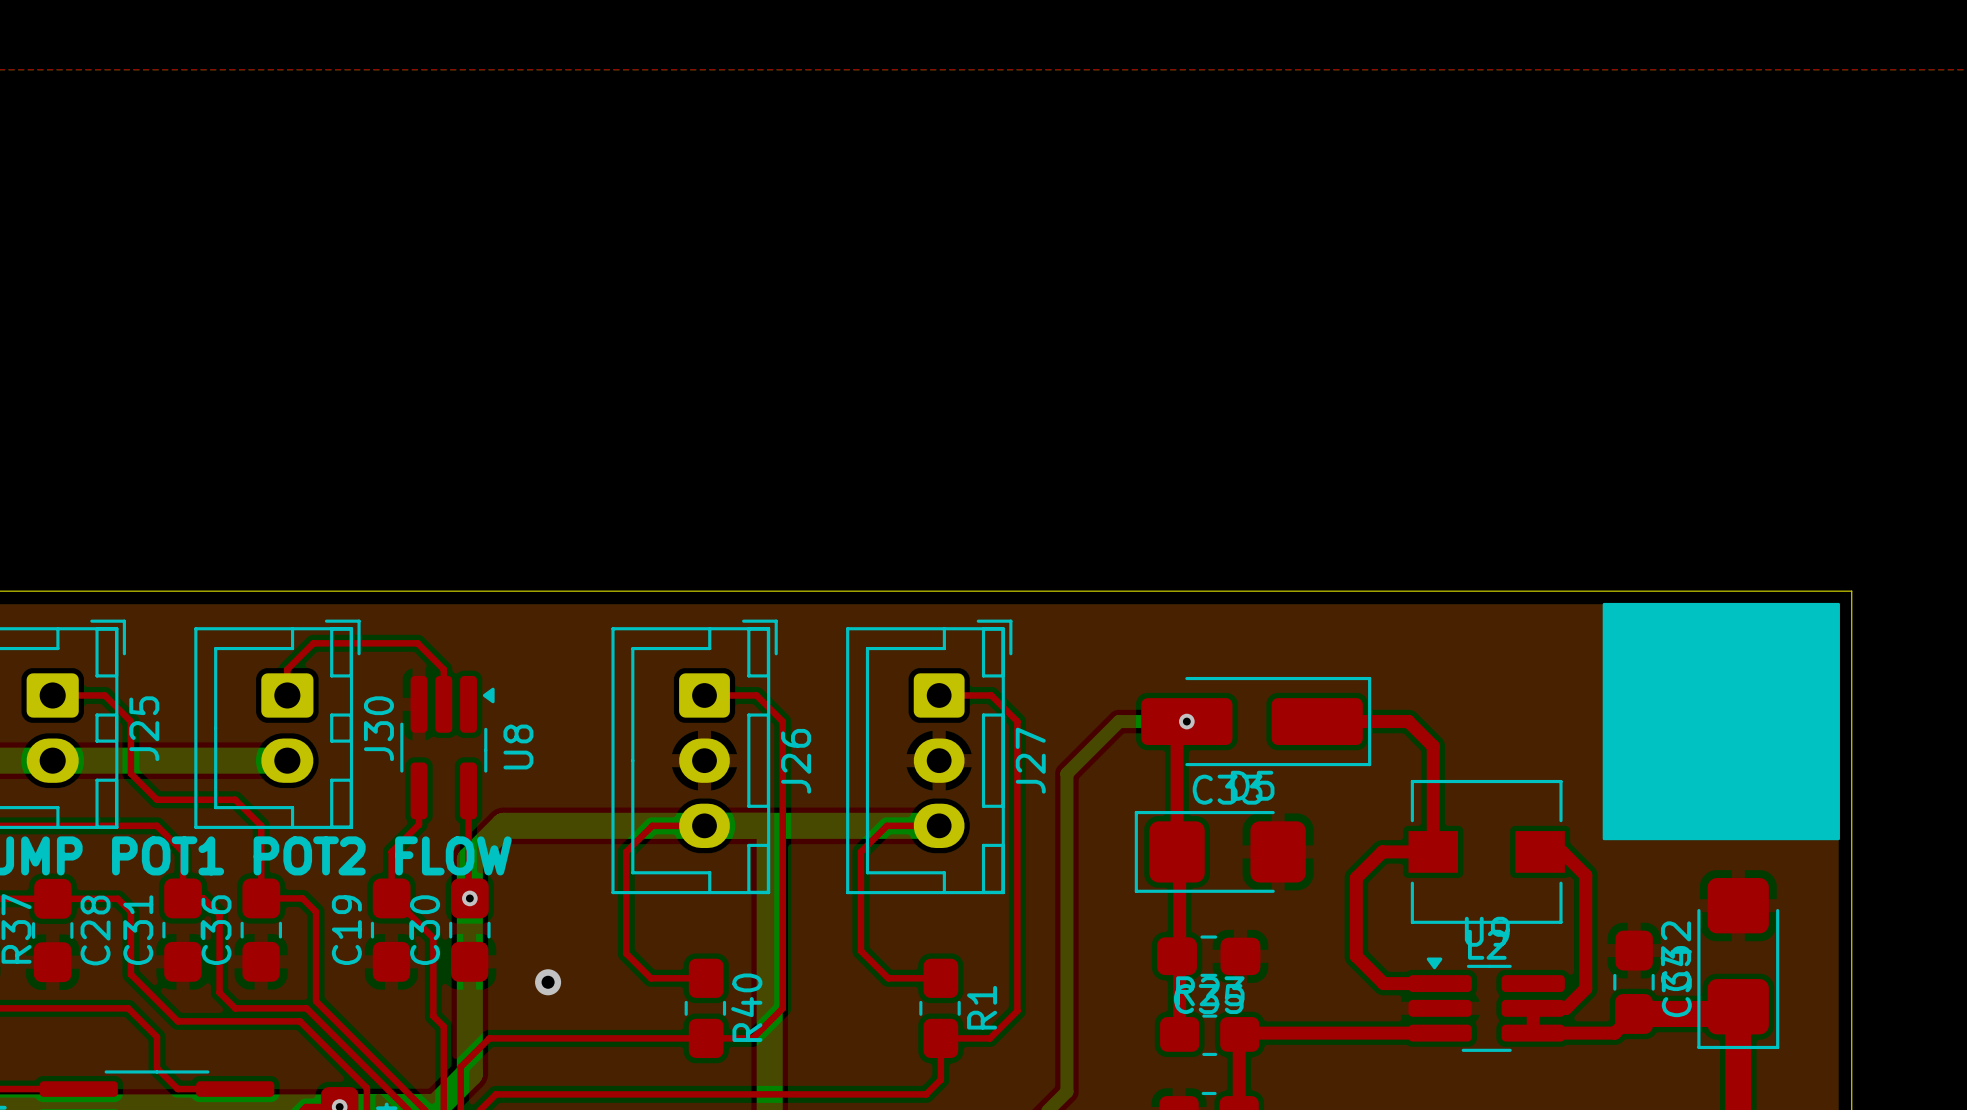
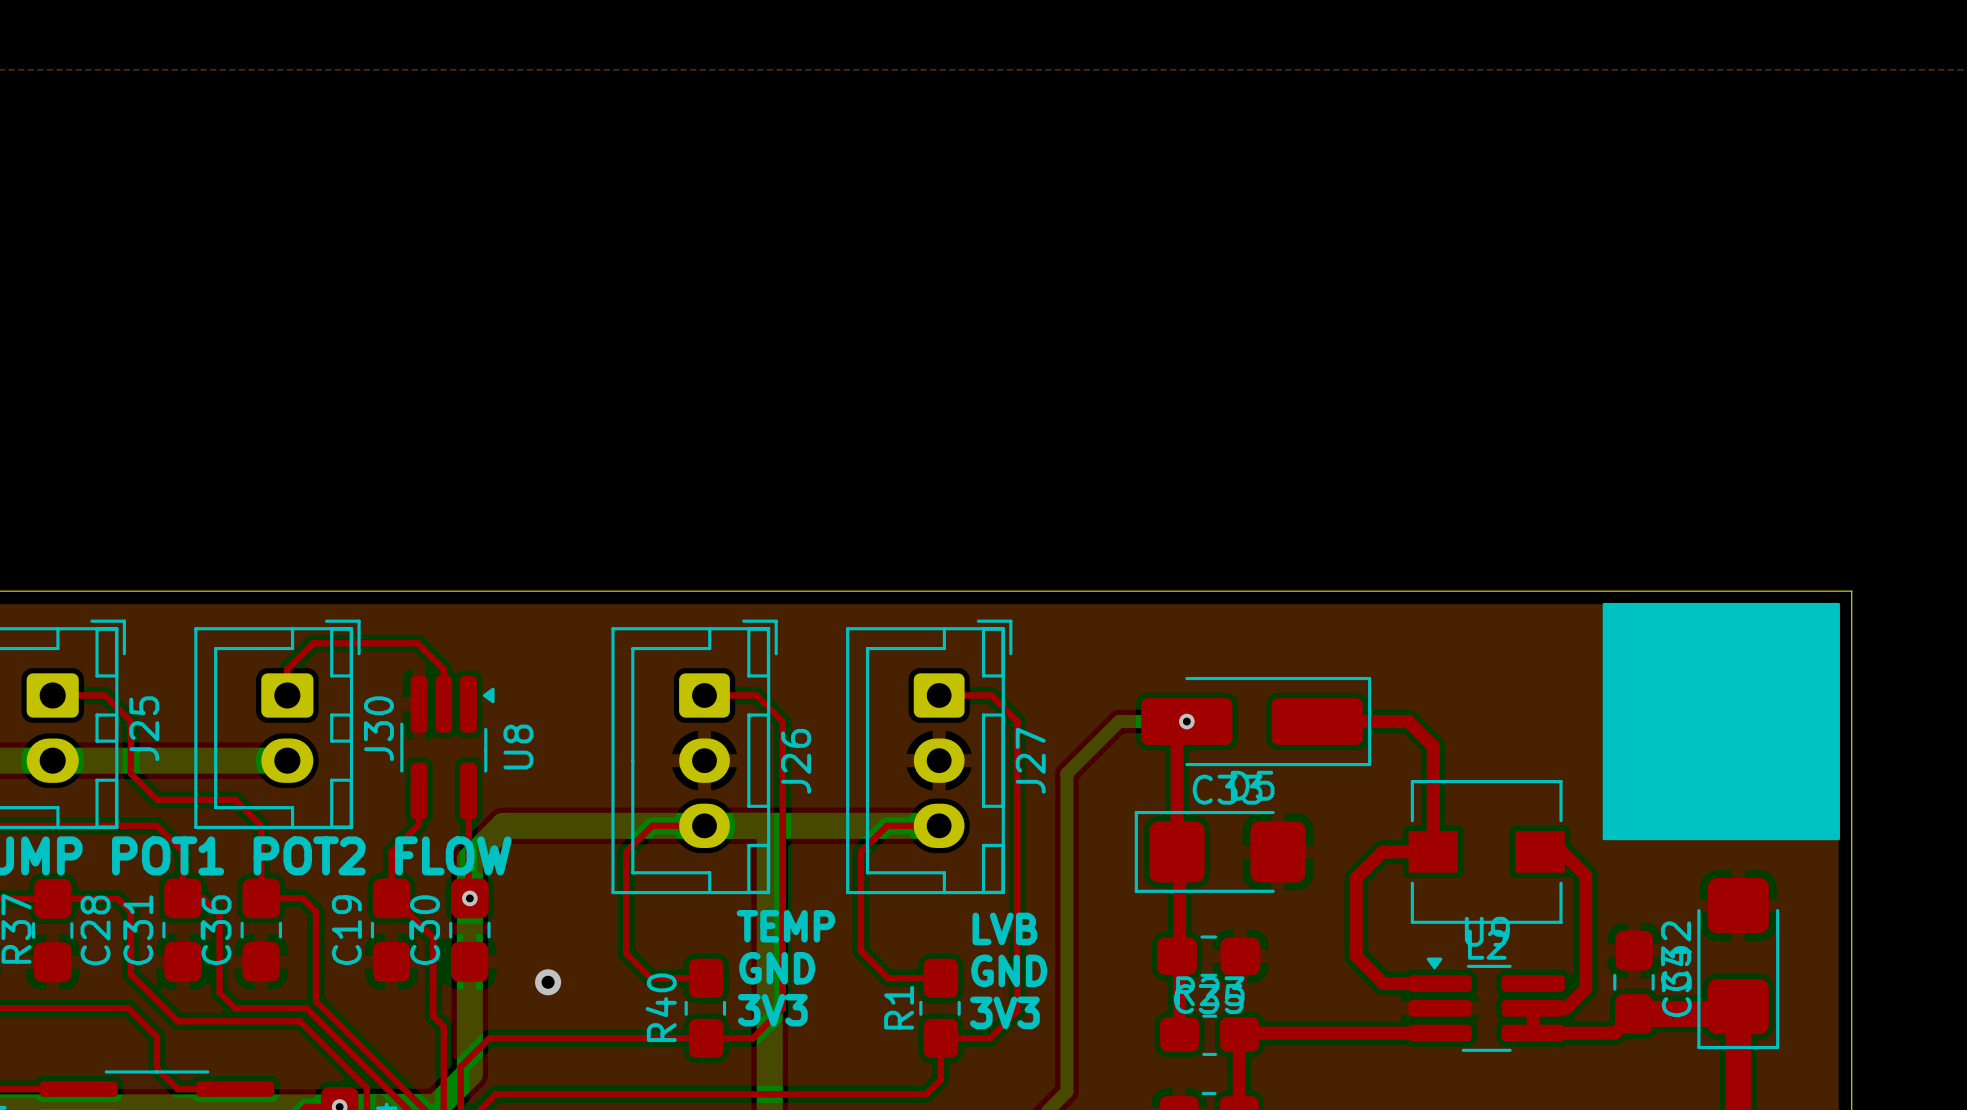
text: none -> TEMP (785, 926)
text: none -> LVB (1004, 928)
text: none -> GND (777, 968)
text: none -> GND (1009, 970)
R40 name position: R40 (746, 1007) -> R40 (661, 1007)
R1 name position: R1 (982, 1007) -> R1 (899, 1007)
text: none -> 3V3 (772, 1010)
text: none -> 3V3 (1004, 1012)

